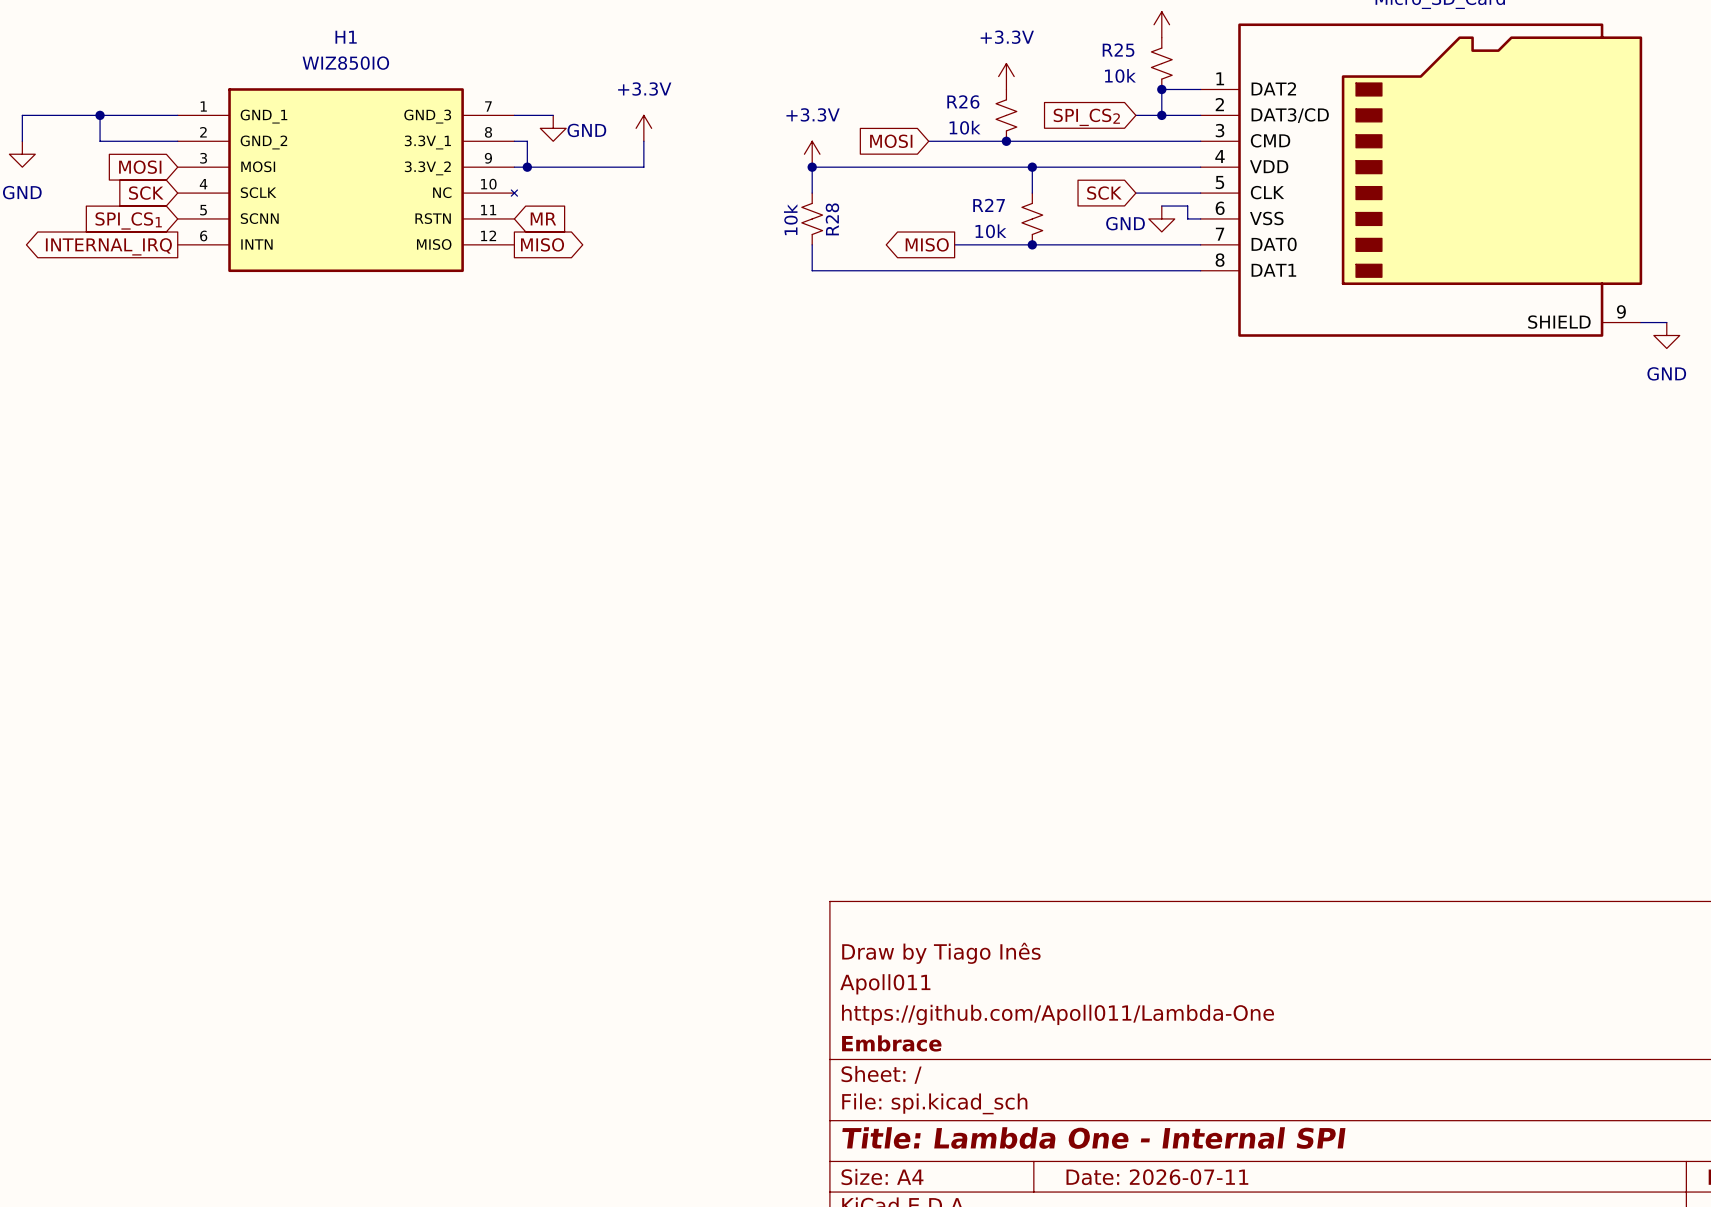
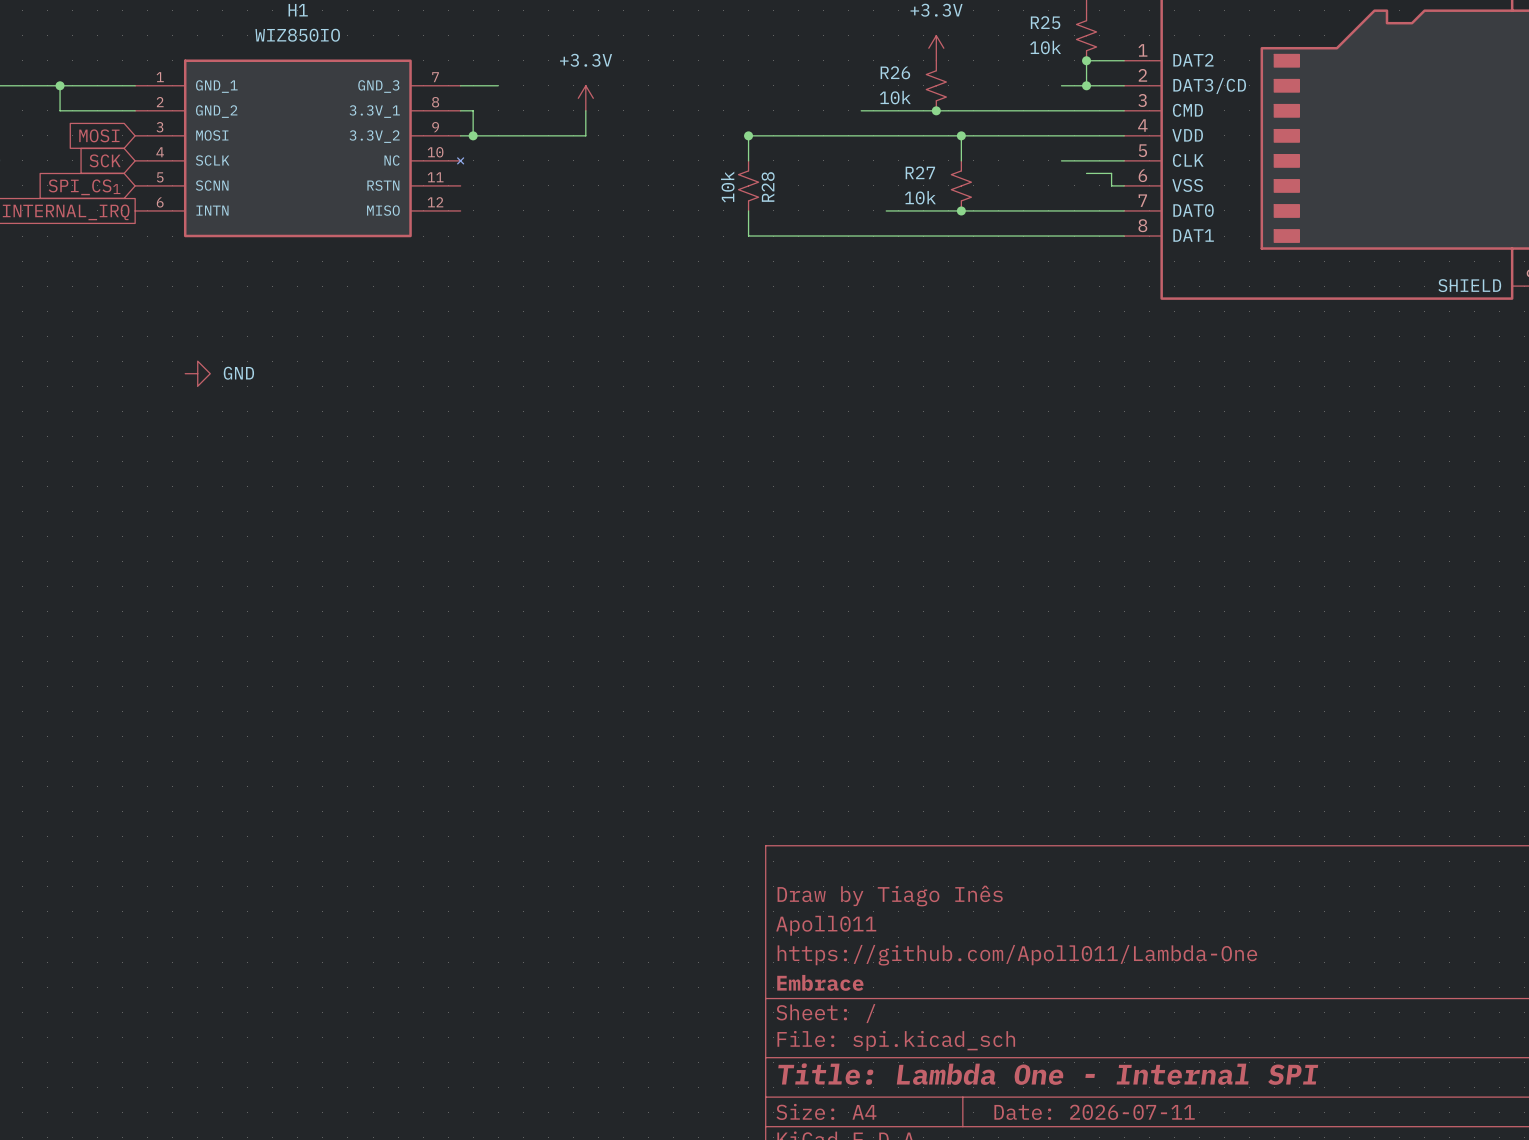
global label: SPI_CS2 (1086, 117) -> none
power symbol: GND (553, 128) -> none
global label: MOSI (891, 141) -> none
power symbol: +3.3V (812, 154) -> none
global label: SCK (1104, 193) -> none
global label: MR (543, 218) -> none
power symbol: GND (1161, 218) -> none
global label: MISO (542, 244) -> none
global label: MISO (927, 244) -> none
power symbol: none -> GND (197, 373)

